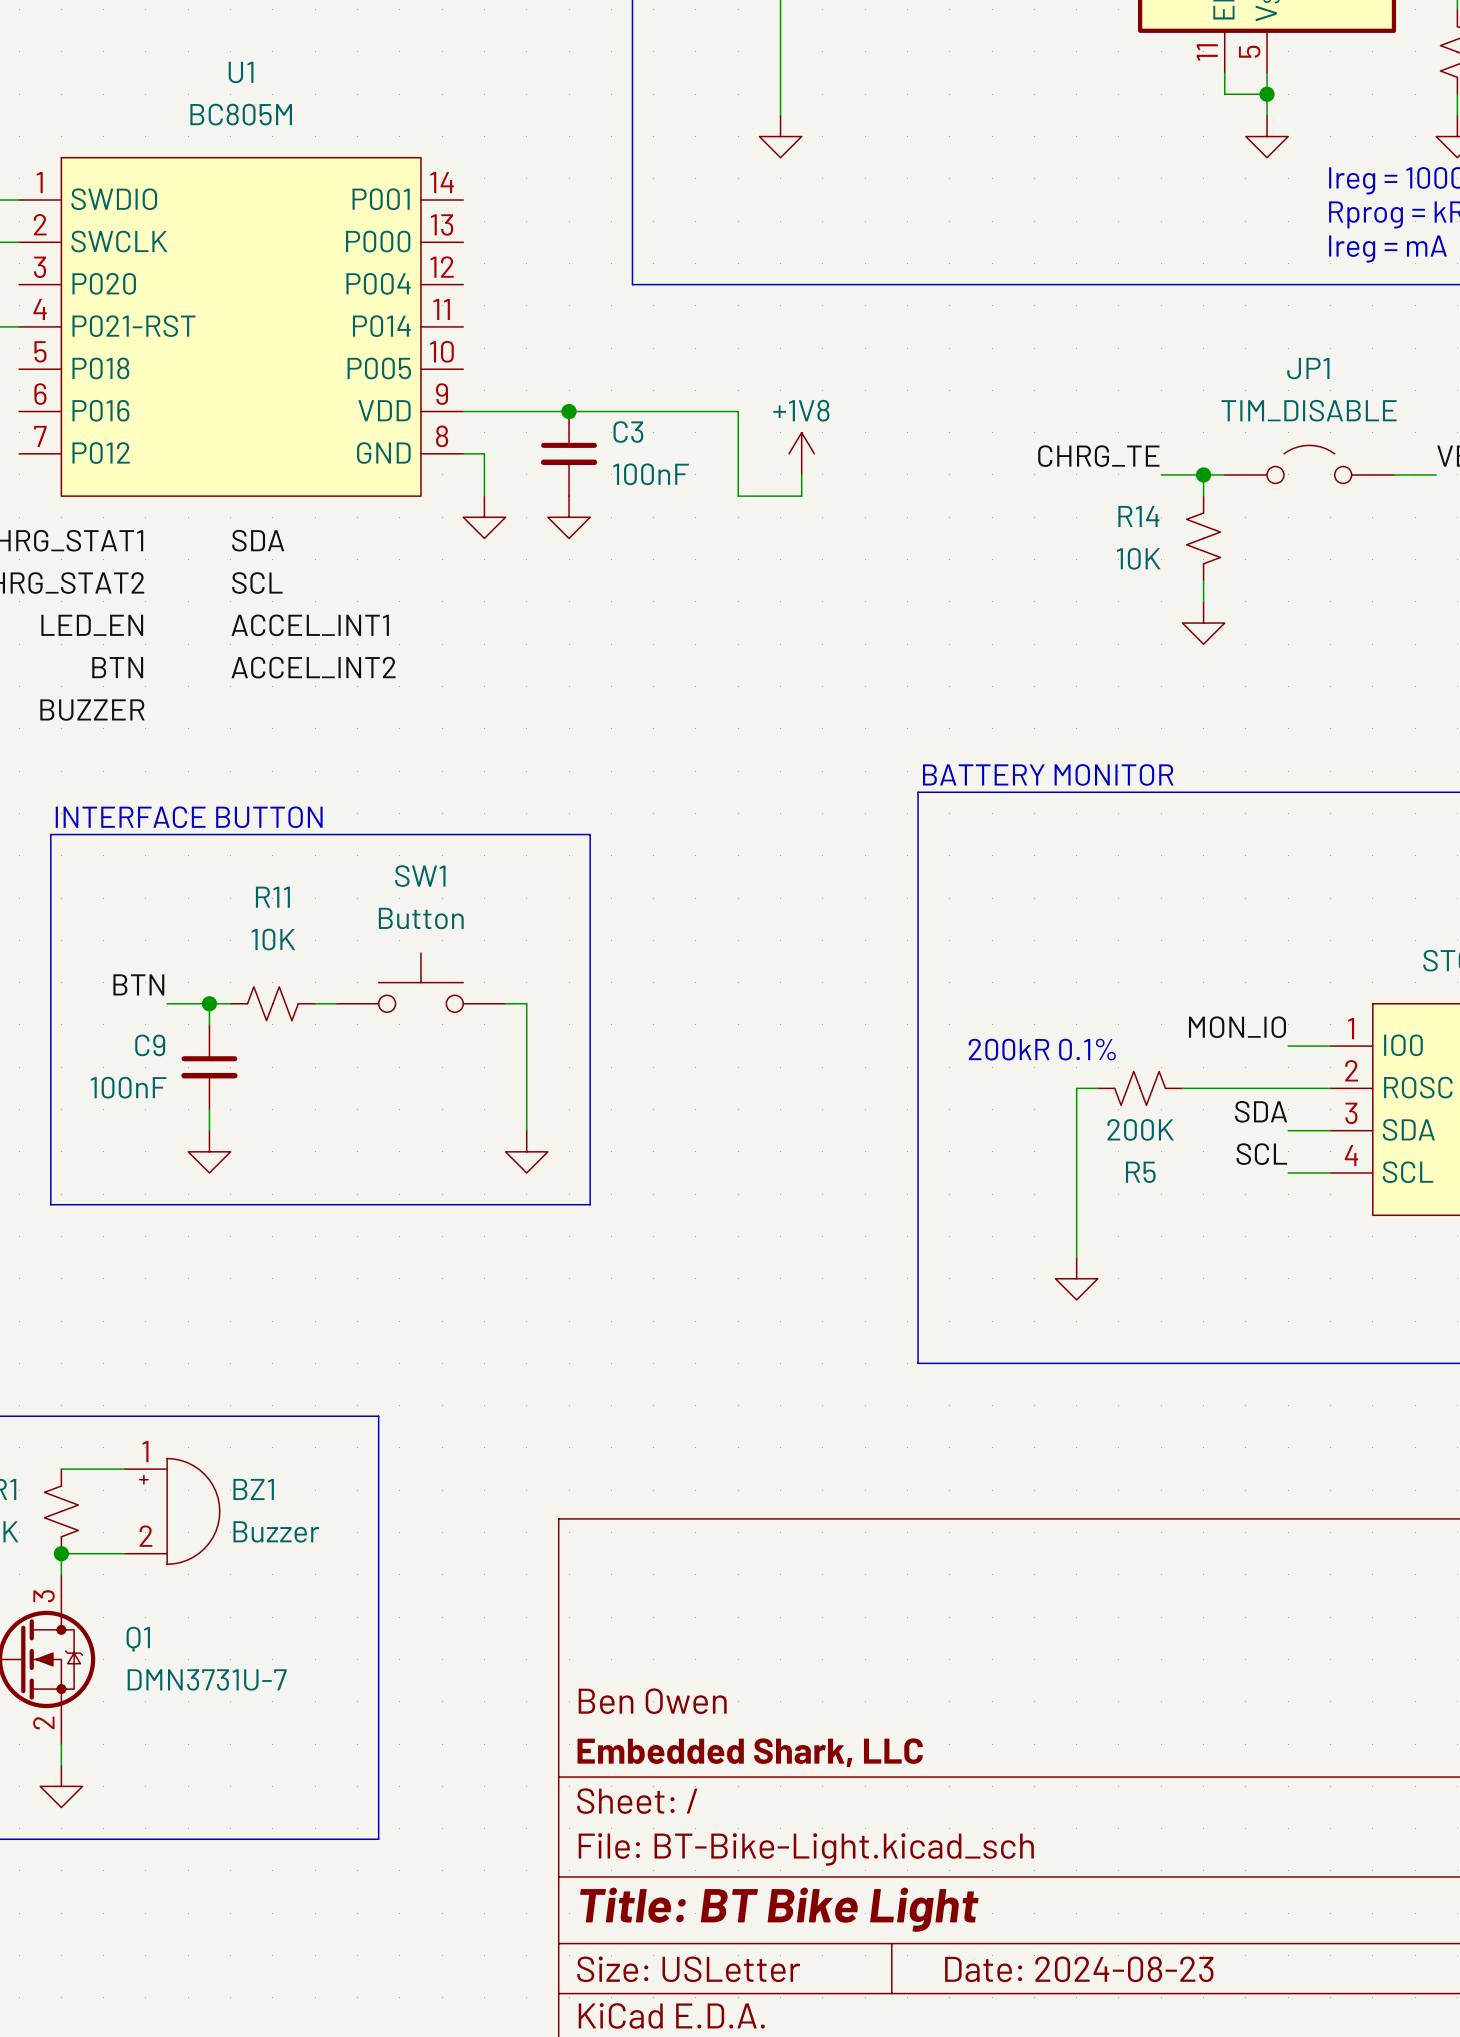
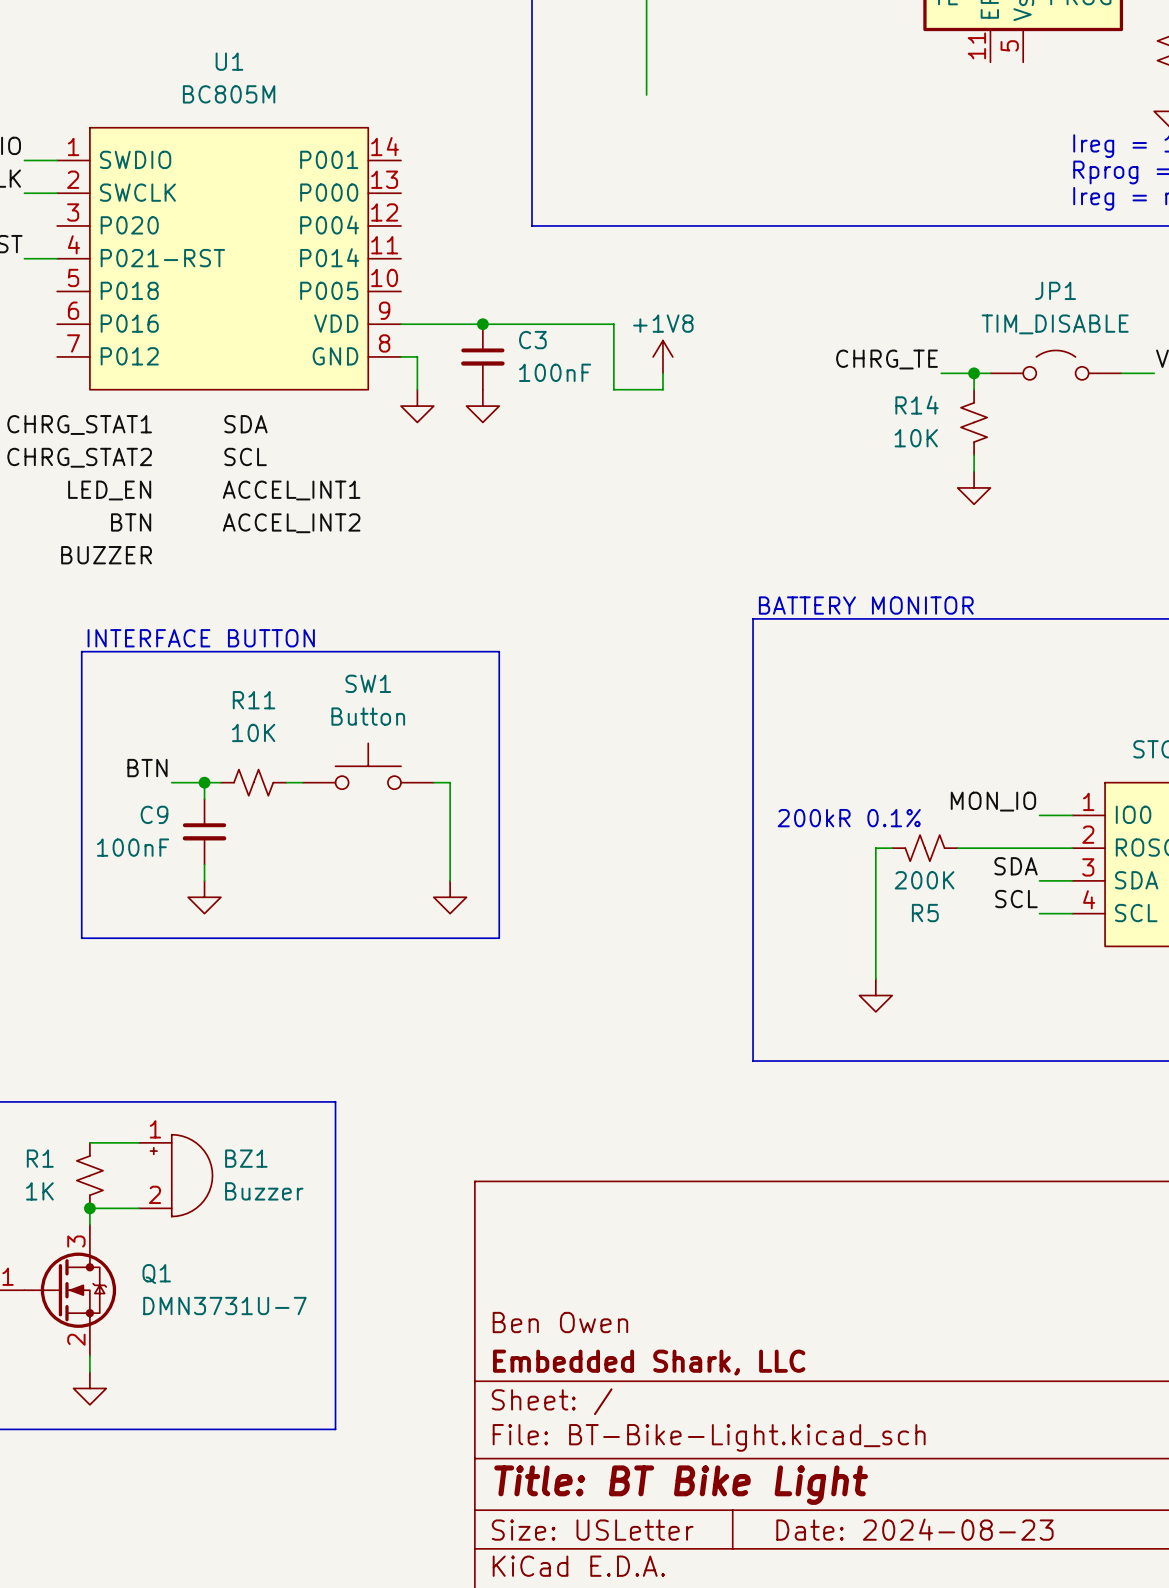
wire: (1224, 73) (1224, 94) (1267, 94) -> none
wire: (1267, 73) (1267, 115) -> none
junction: (1267, 94) -> none
power symbol: (780, 136) -> none
power symbol: (1267, 136) -> none

